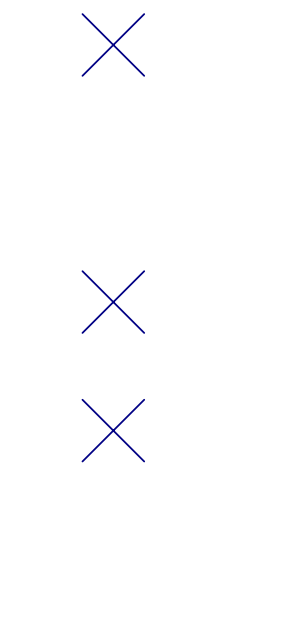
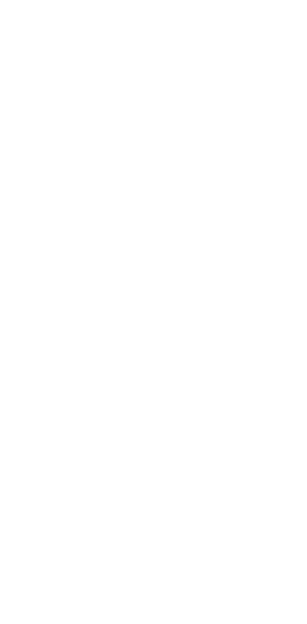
no-connect mark: (113, 44) -> none
no-connect mark: (113, 302) -> none
no-connect mark: (113, 430) -> none

